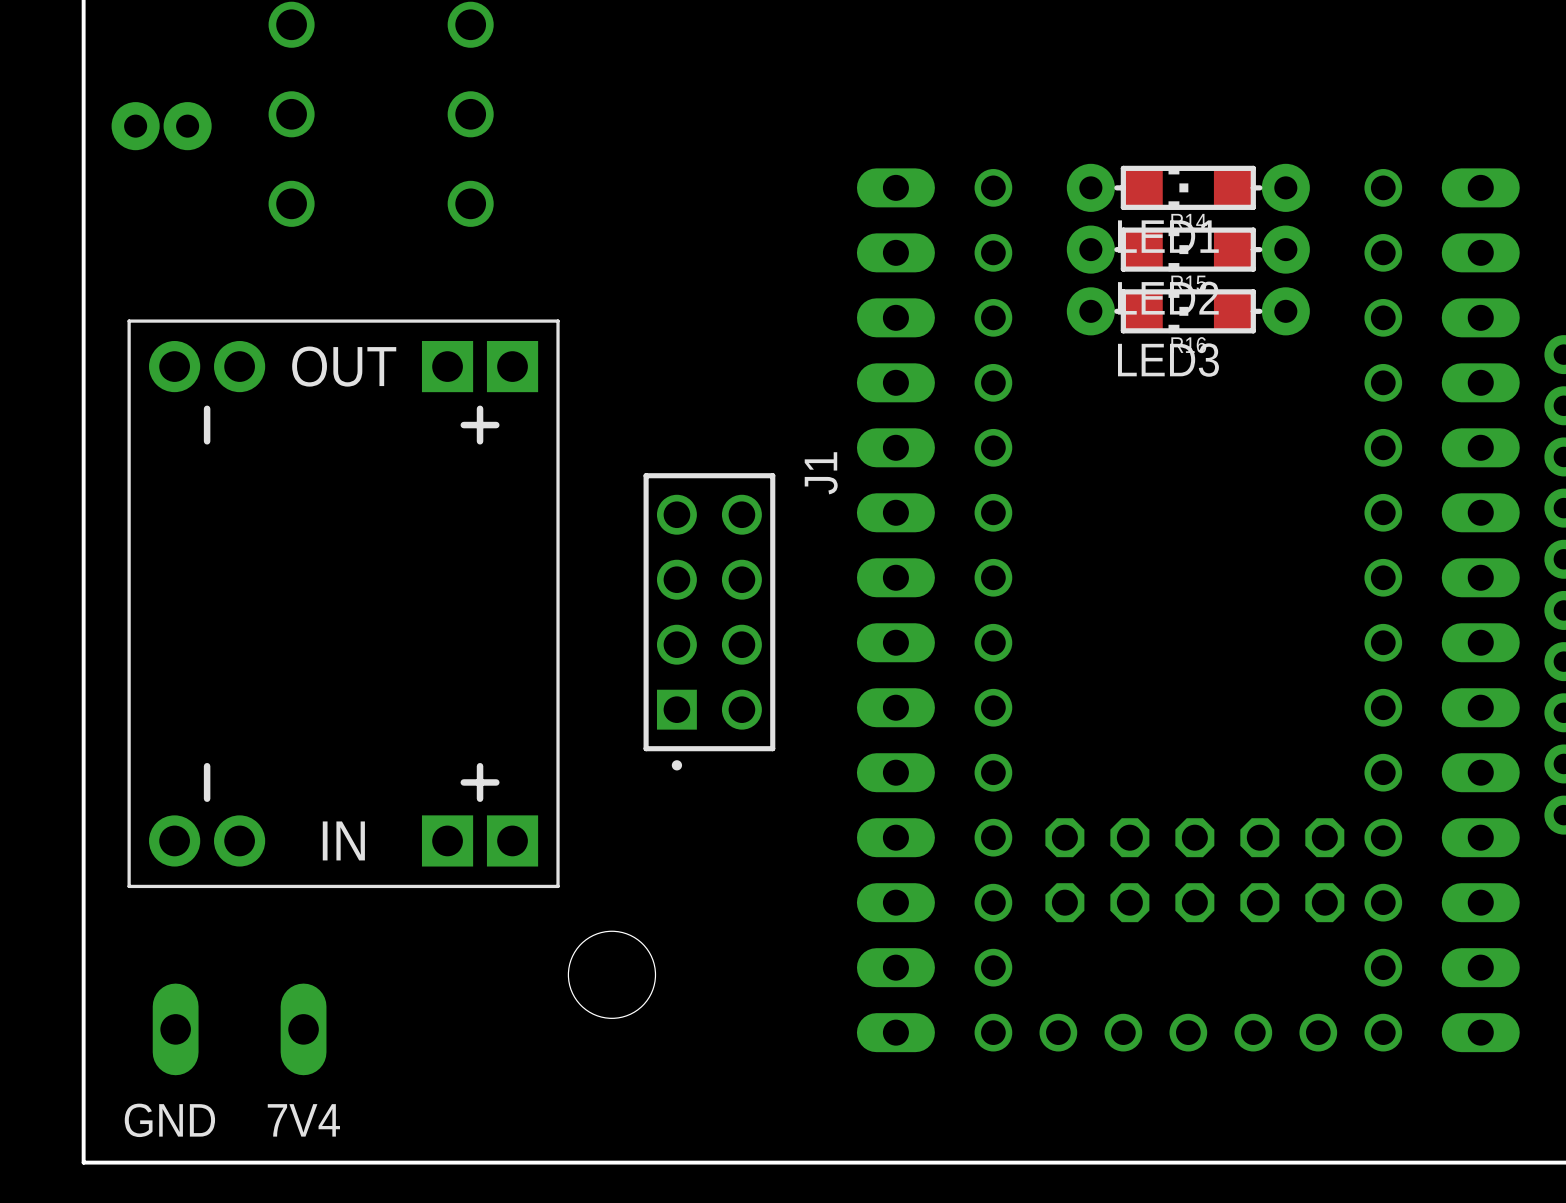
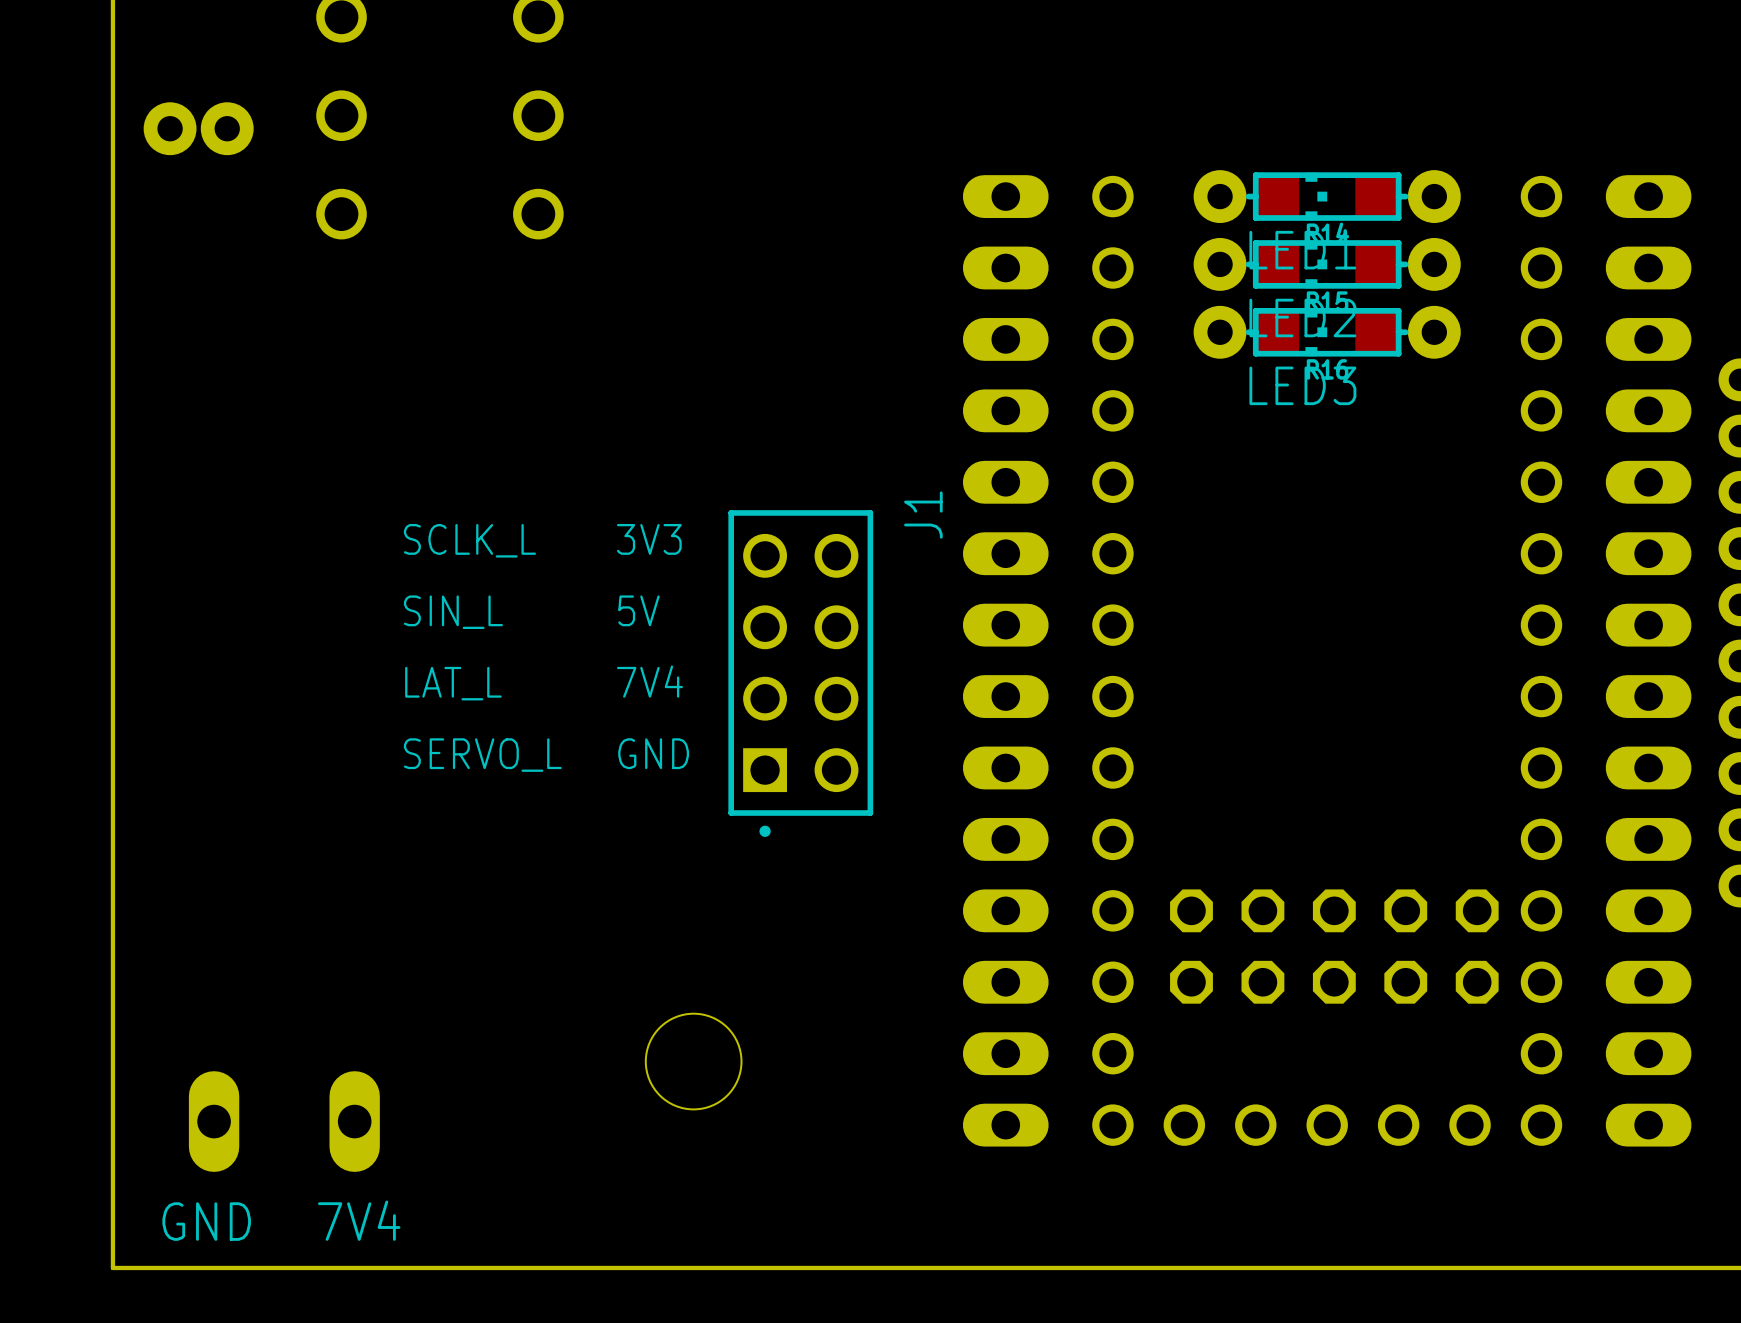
text: none -> 3V3 (649, 539)
text: none -> SCLK_L (469, 540)
text: none -> 5V (638, 610)
text: none -> SIN_L (453, 612)
part: (343, 603) -> none
text: none -> 7V4 (649, 681)
text: none -> LAT_L (453, 683)
text: none -> GND (653, 753)
text: none -> SERVO_L (482, 755)

